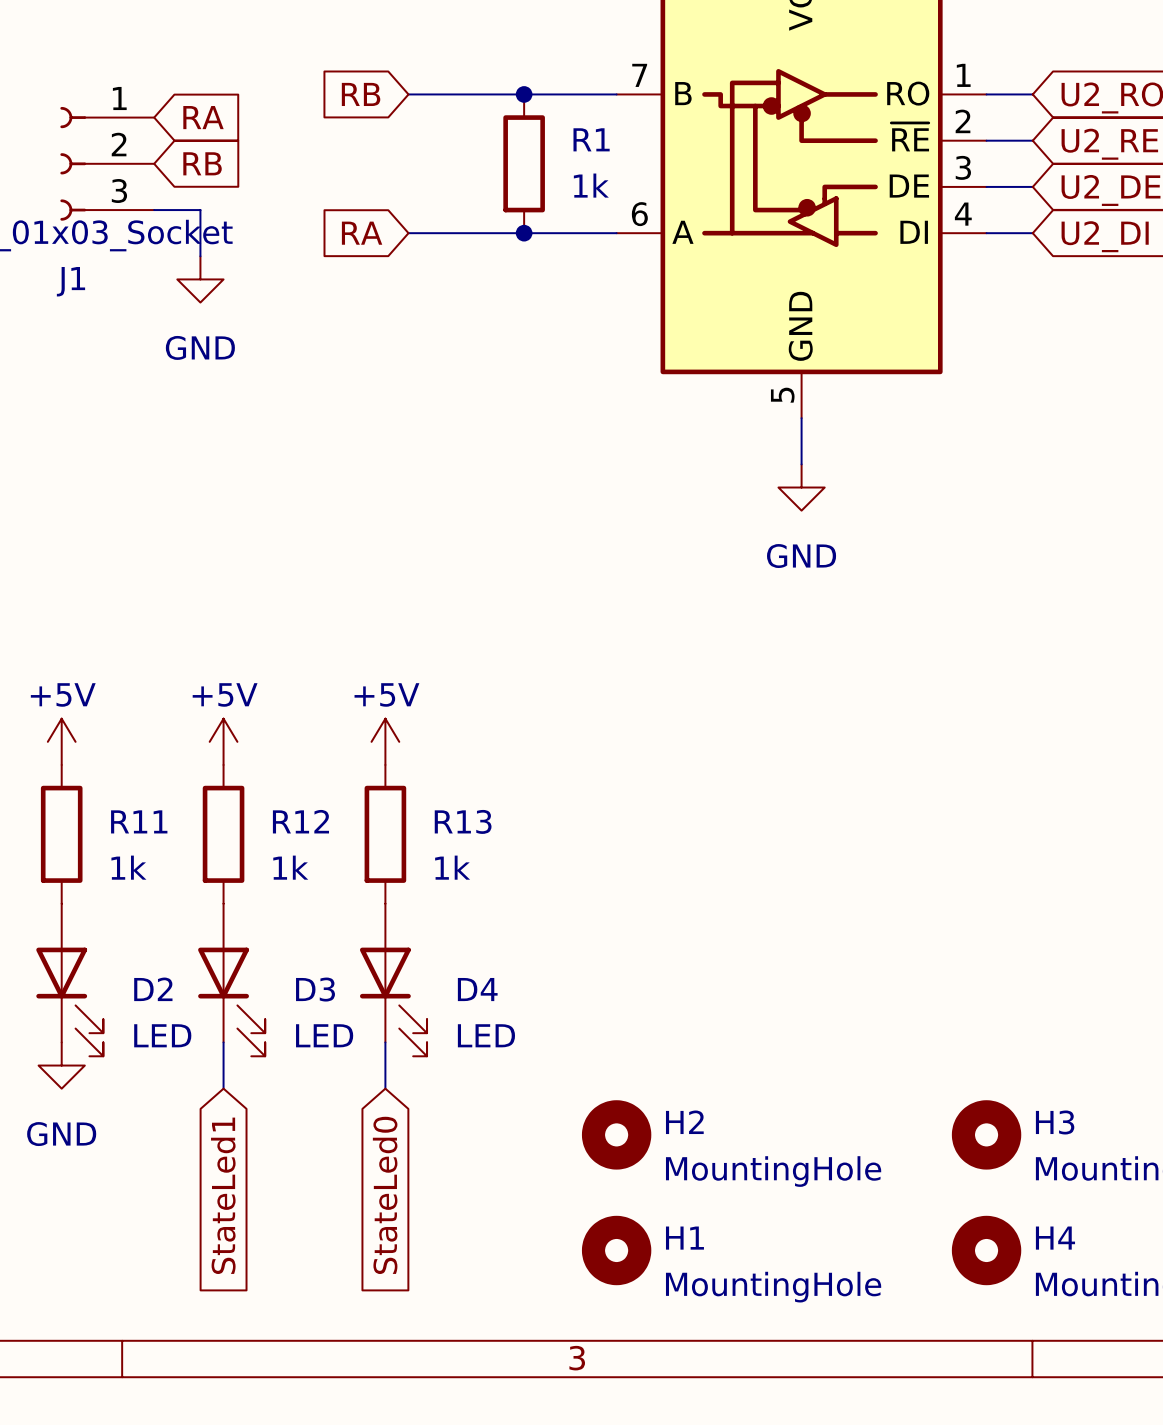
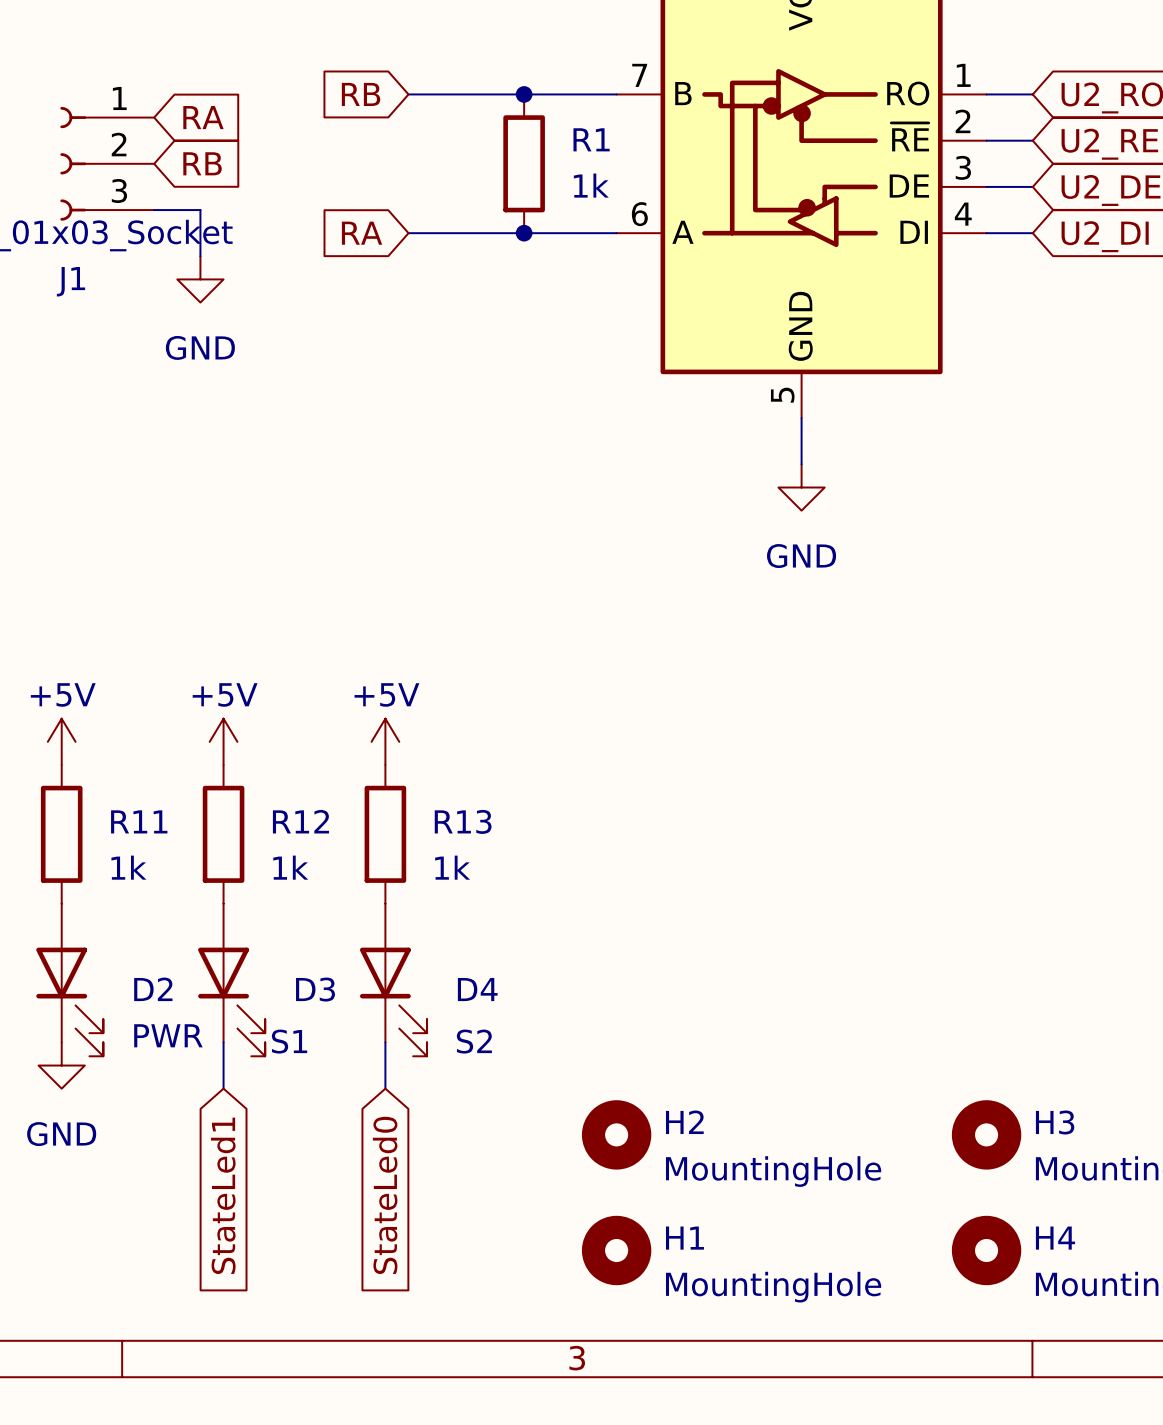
D2 value: LED (162, 1035) -> PWR (168, 1035)
D3 value: LED (324, 1035) -> S1 (289, 1041)
D4 value: LED (486, 1035) -> S2 (474, 1041)

